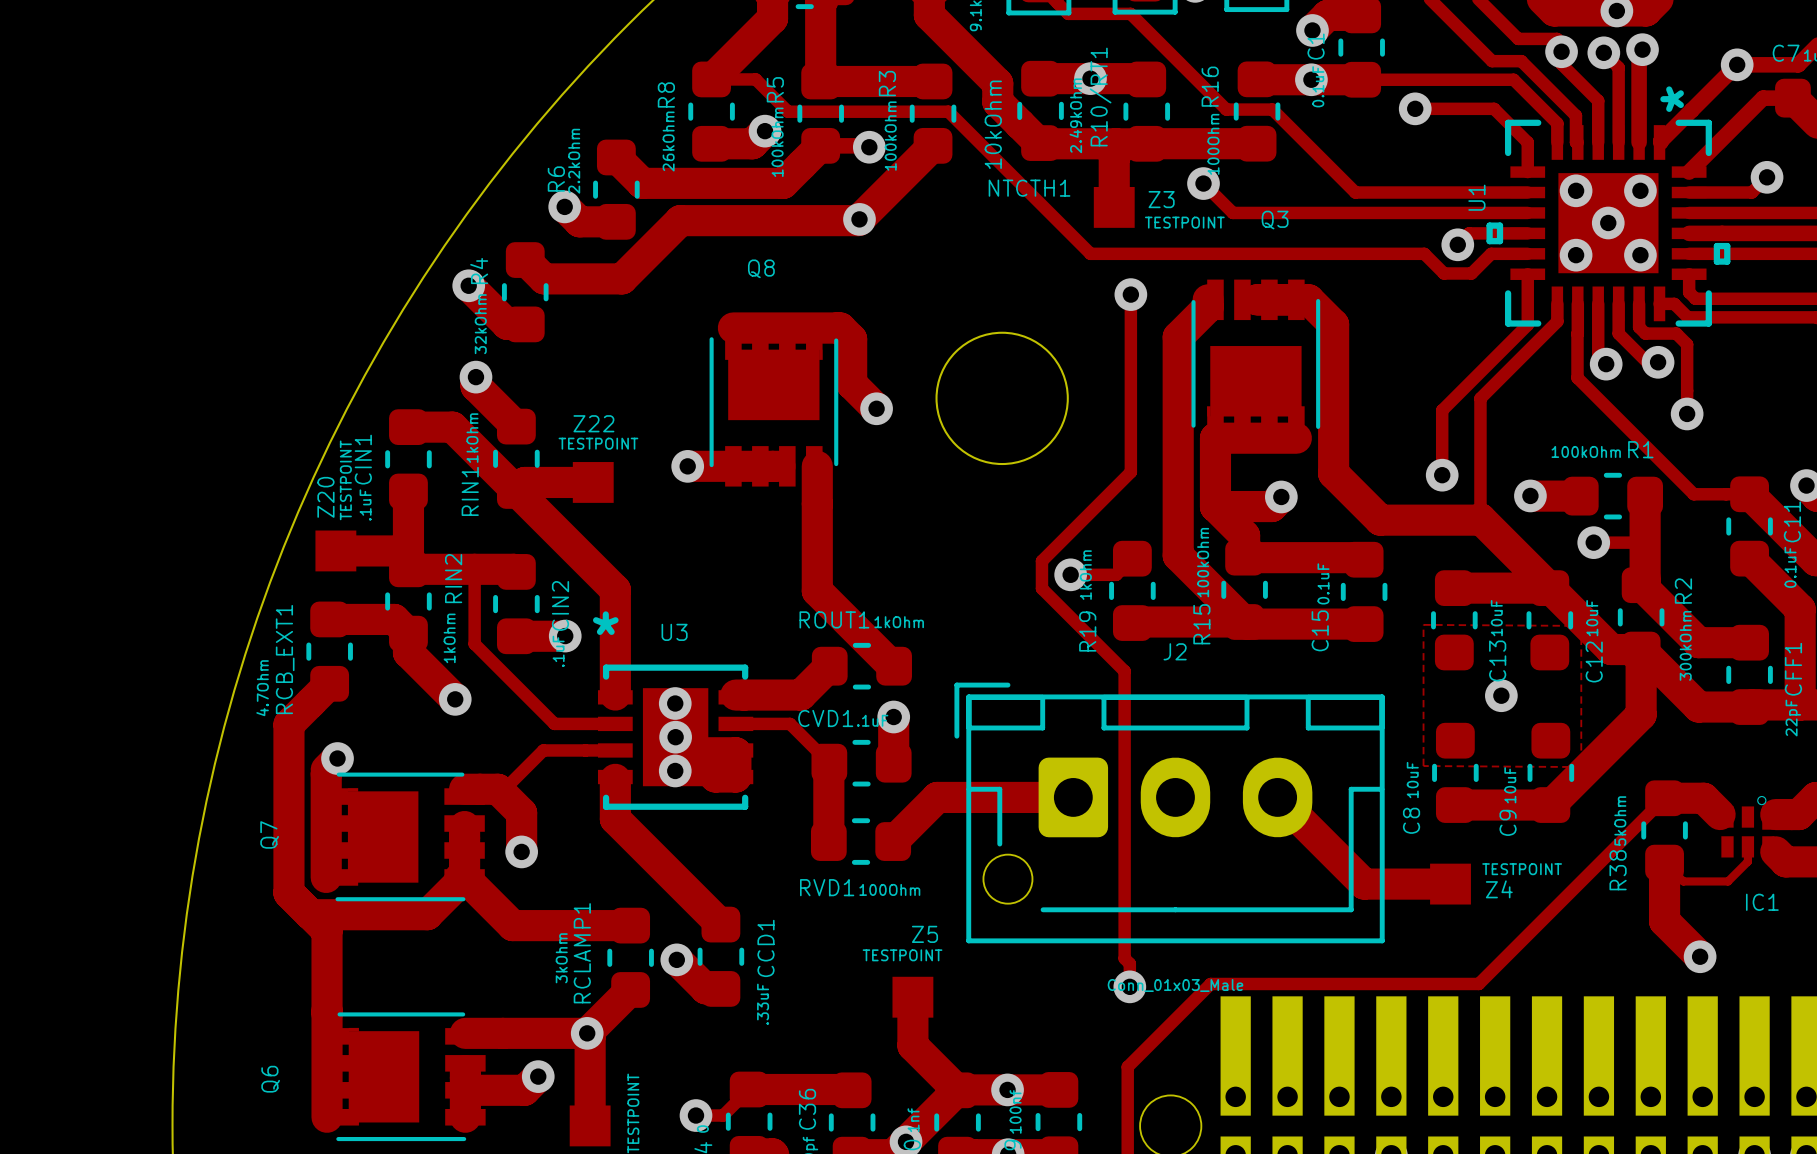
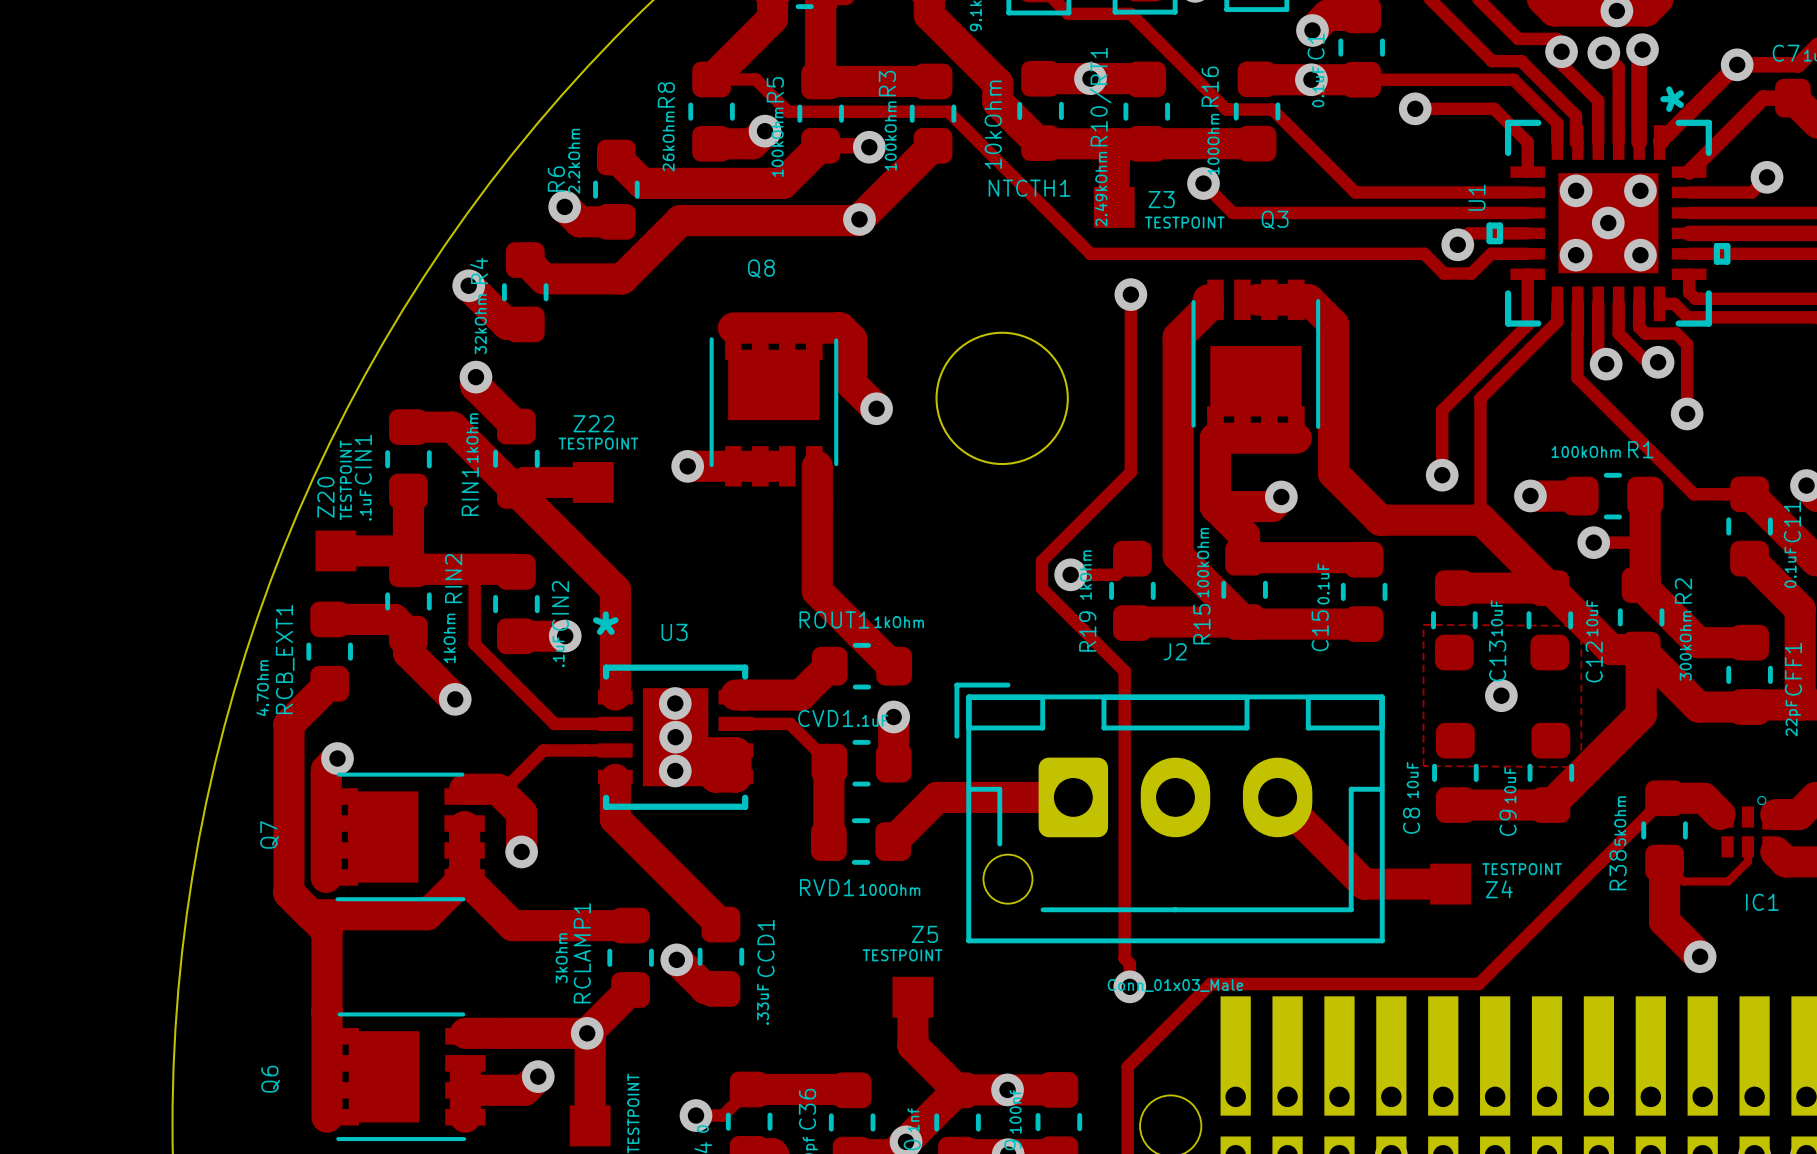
R10/RT1 value position: 2.49kOhm (1075, 115) -> 2.49kOhm (1101, 189)

